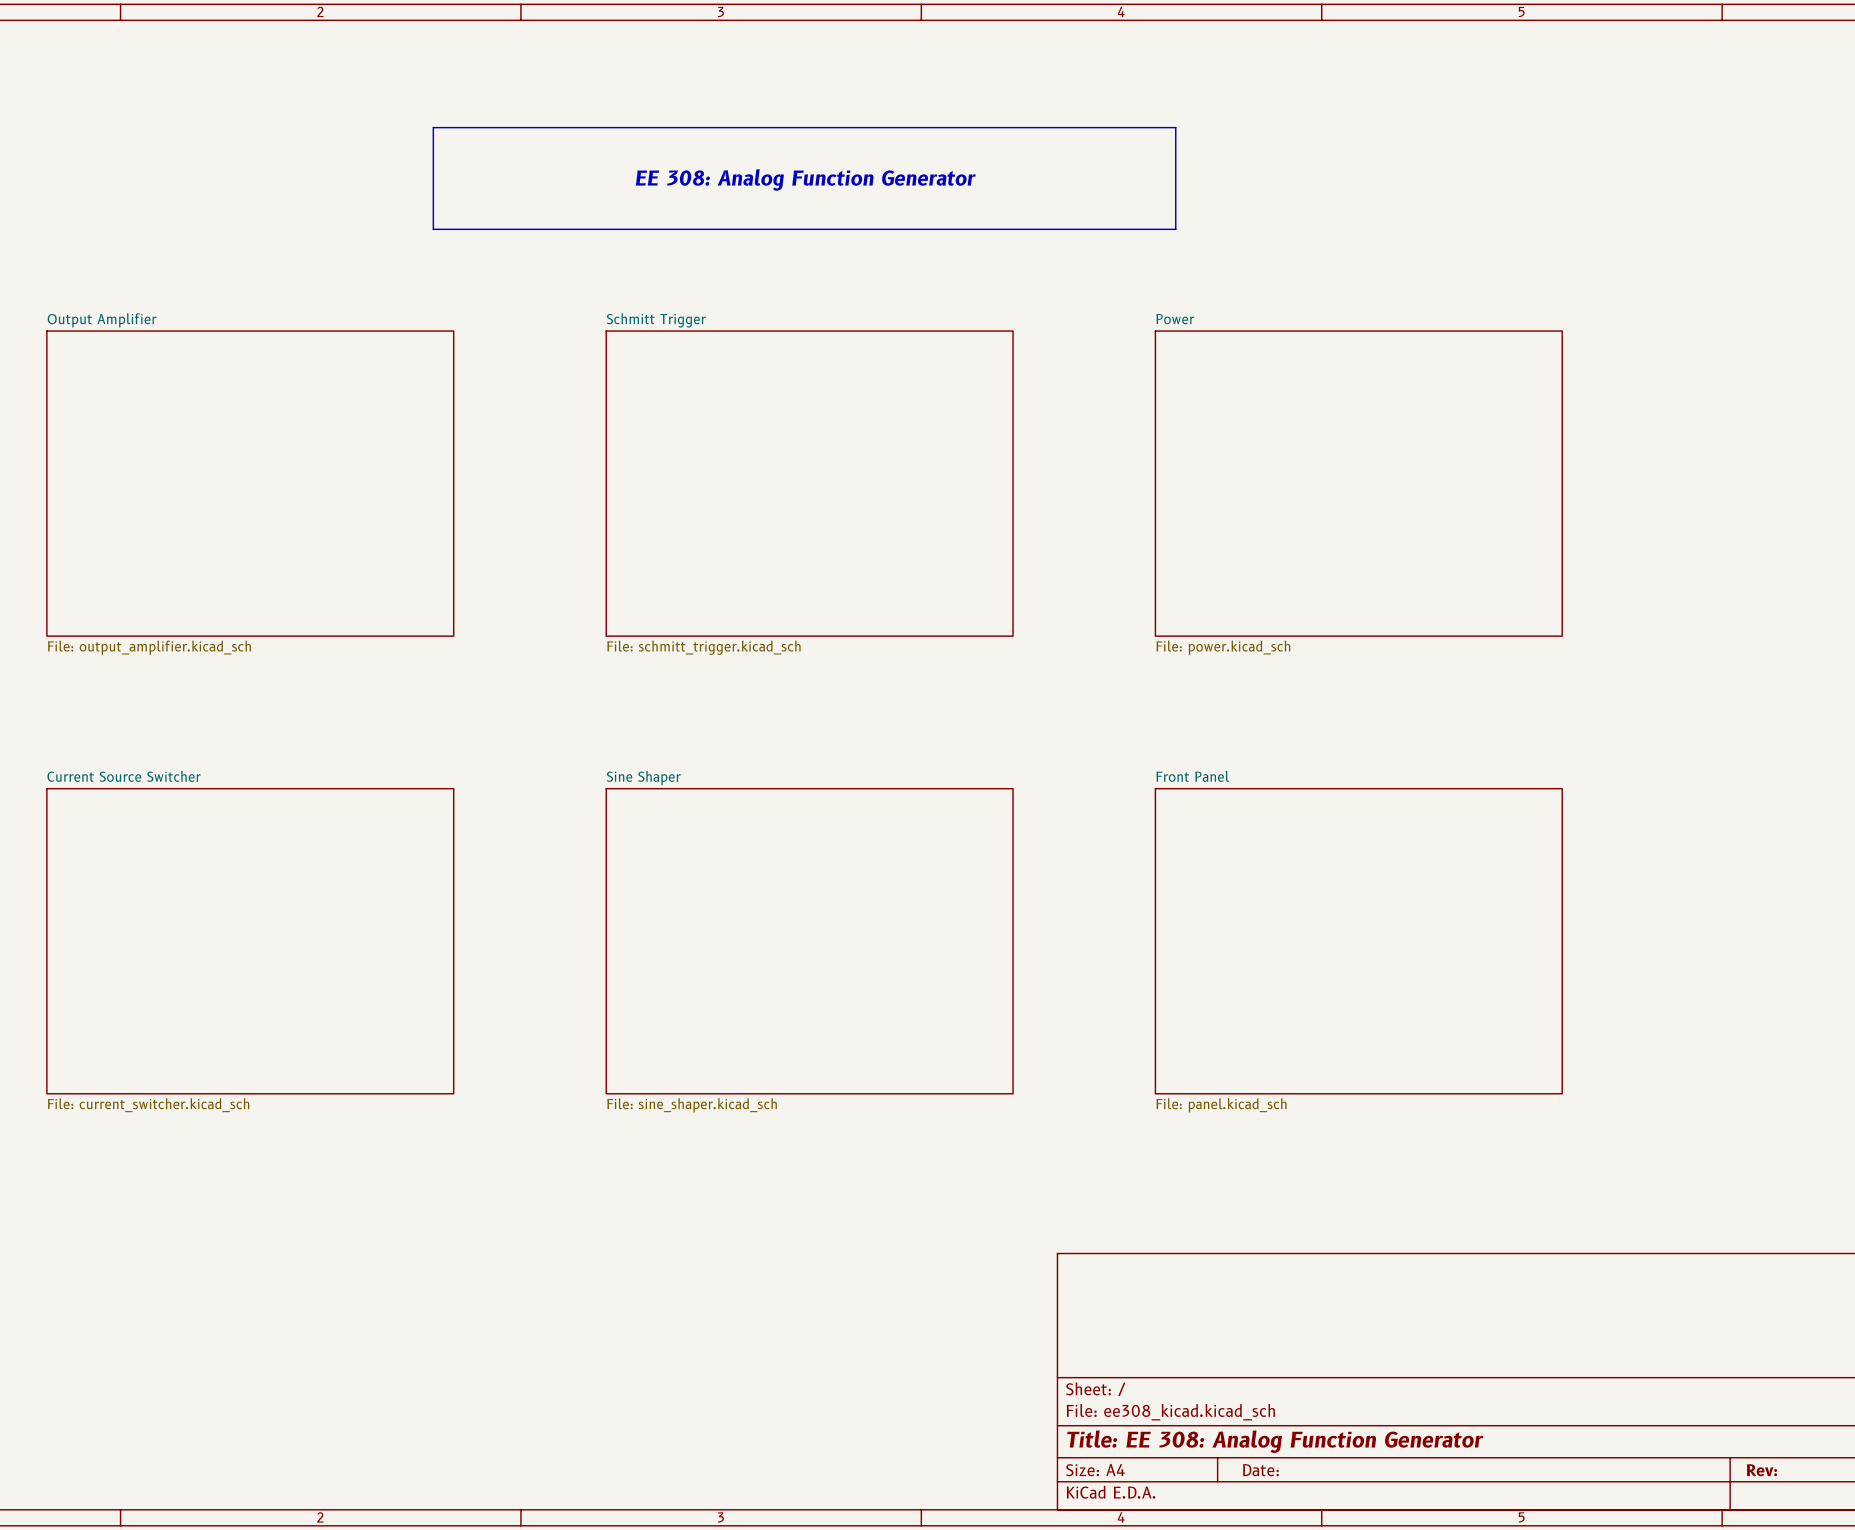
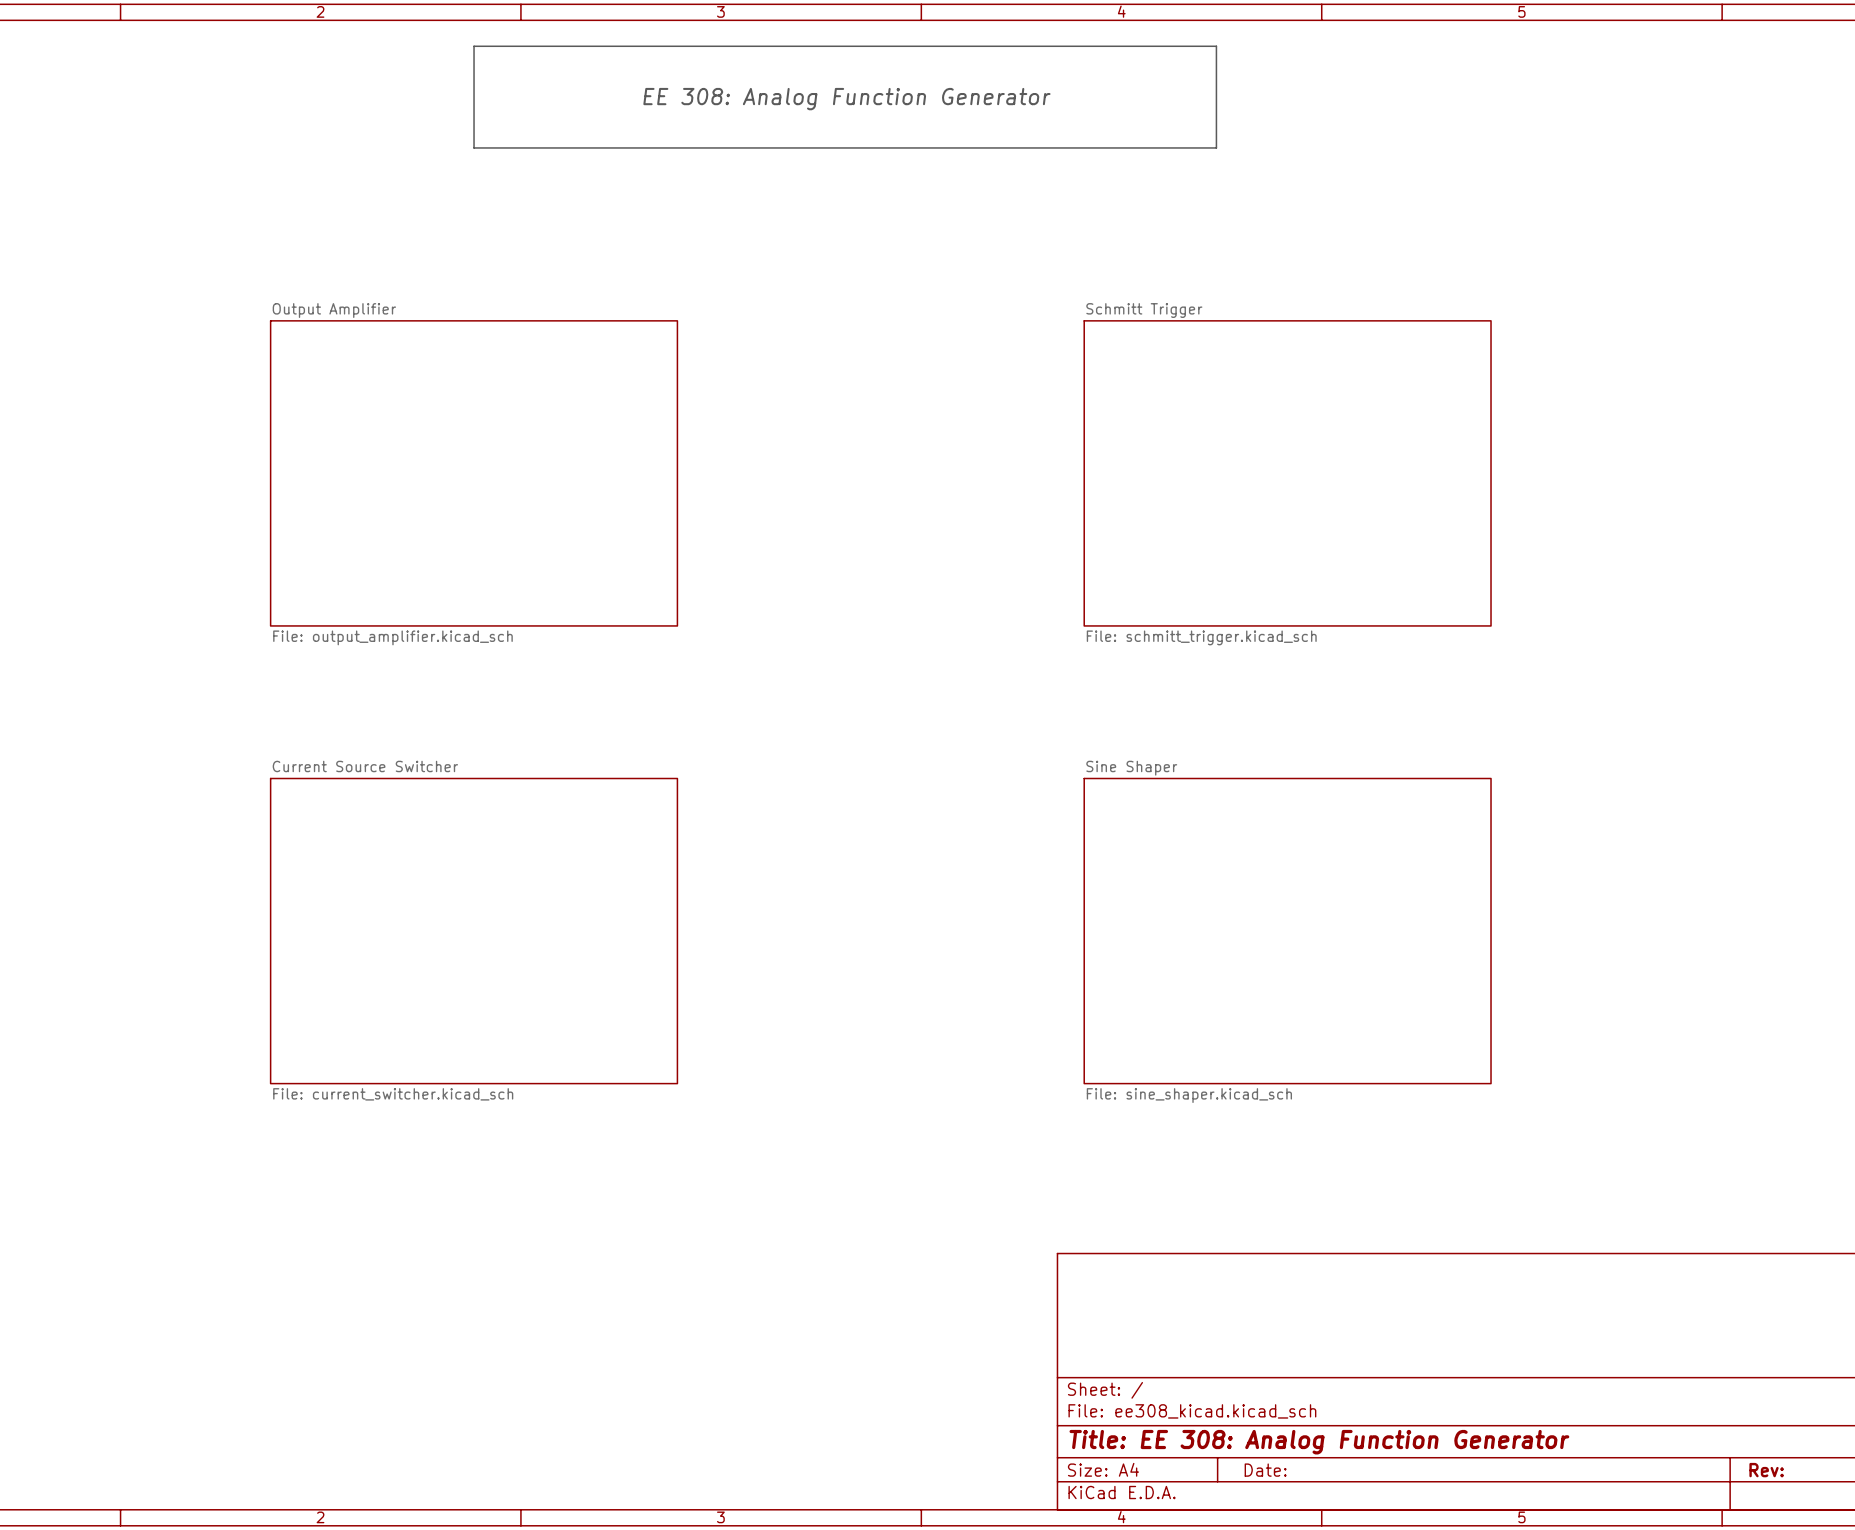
line: (433, 127) (1175, 127) (1175, 229) (433, 229) (433, 127) -> (474, 46) (1216, 46) (1216, 147) (474, 147) (474, 46)
text position: EE 308: Analog Function Generator (805, 179) -> EE 308: Analog Function Generator (846, 99)
sheet Output Amplifier: none -> File: output_amplifier.kicad_sch (474, 473)
sheet Schmitt Trigger: none -> File: schmitt_trigger.kicad_sch (1287, 473)
sheet Output Amplifier: File: output_amplifier.kicad_sch (250, 483) -> none
sheet Schmitt Trigger: File: schmitt_trigger.kicad_sch (809, 483) -> none
sheet Power: File: power.kicad_sch (1358, 483) -> none
sheet Current Source Switcher: none -> File: current_switcher.kicad_sch (474, 931)
sheet Sine Shaper: none -> File: sine_shaper.kicad_sch (1287, 931)
sheet Current Source Switcher: File: current_switcher.kicad_sch (250, 941) -> none
sheet Sine Shaper: File: sine_shaper.kicad_sch (809, 941) -> none
sheet Front Panel: File: panel.kicad_sch (1358, 941) -> none

